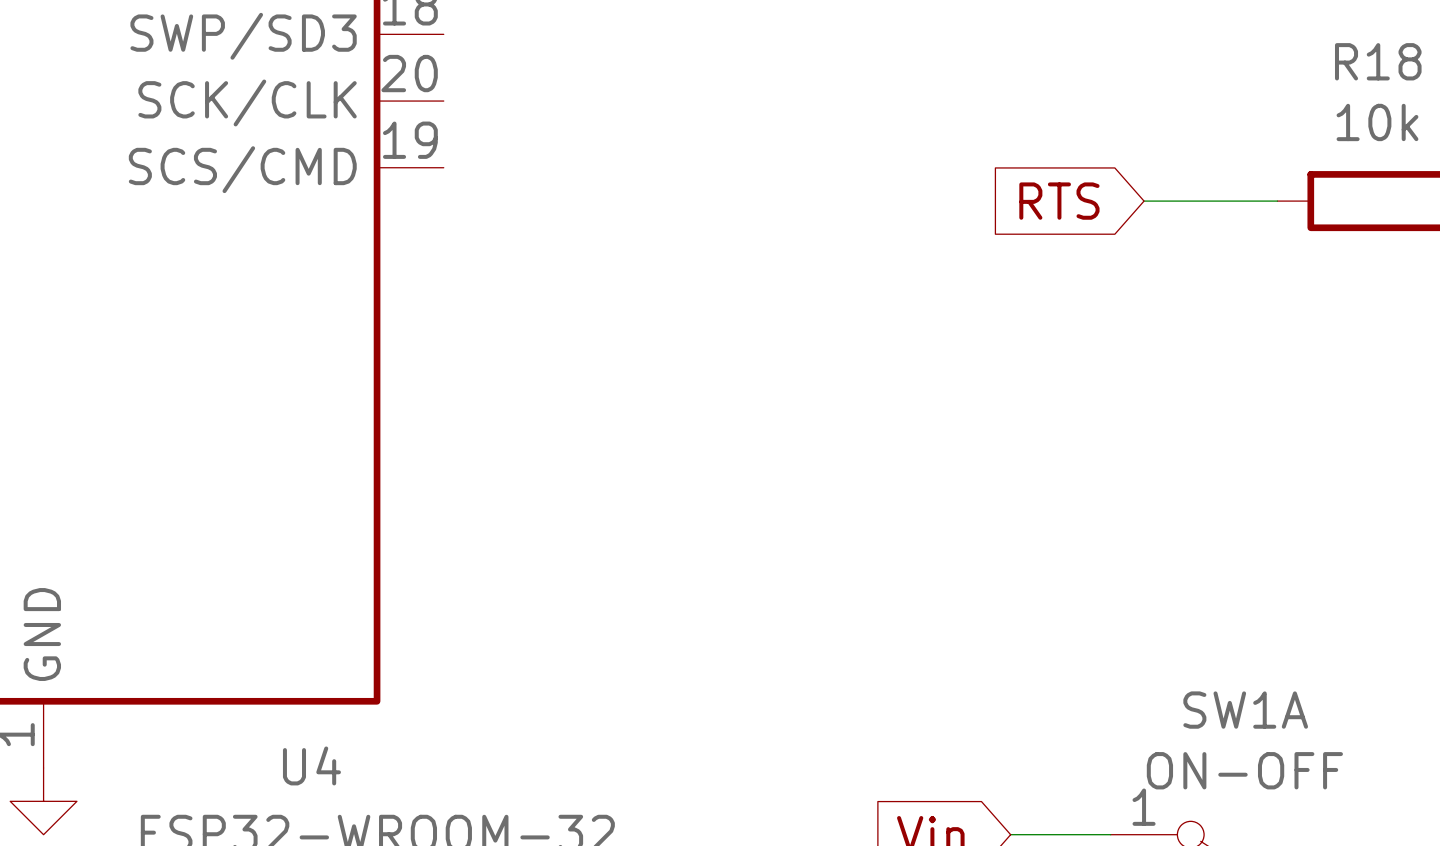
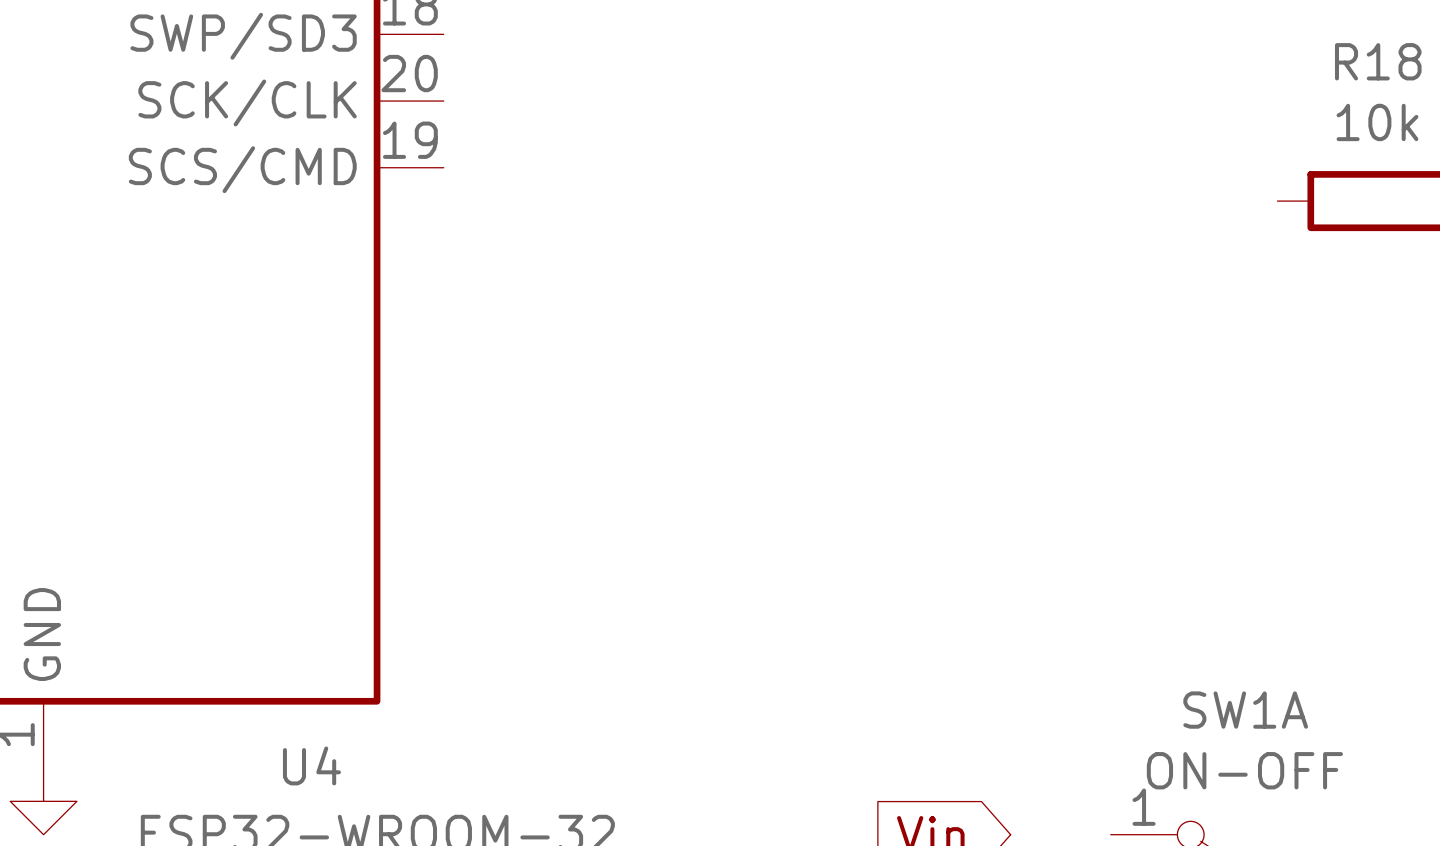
global label: RTS (1059, 201) -> none
wire: (1144, 201) (1277, 201) -> none
wire: (1010, 834) (1110, 834) -> none

